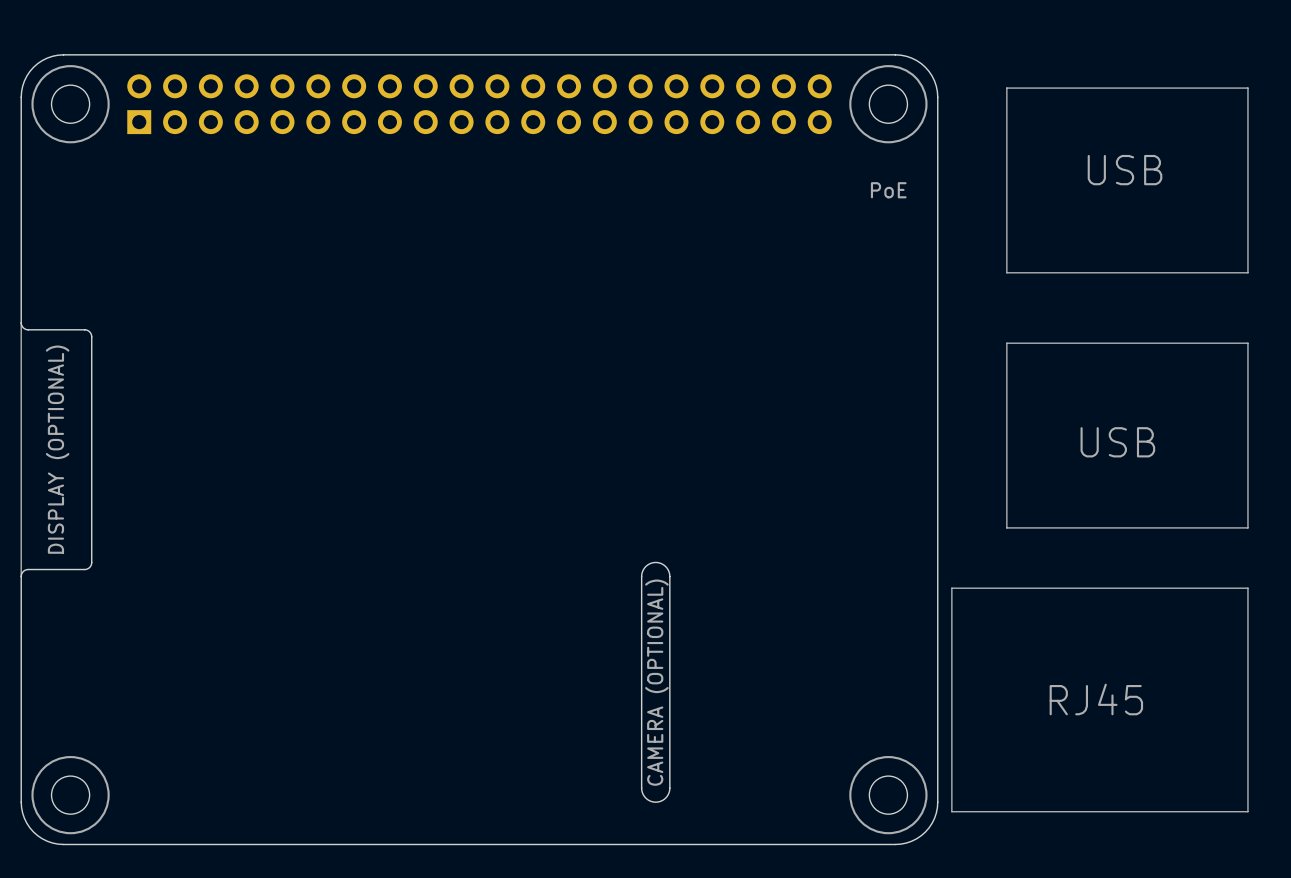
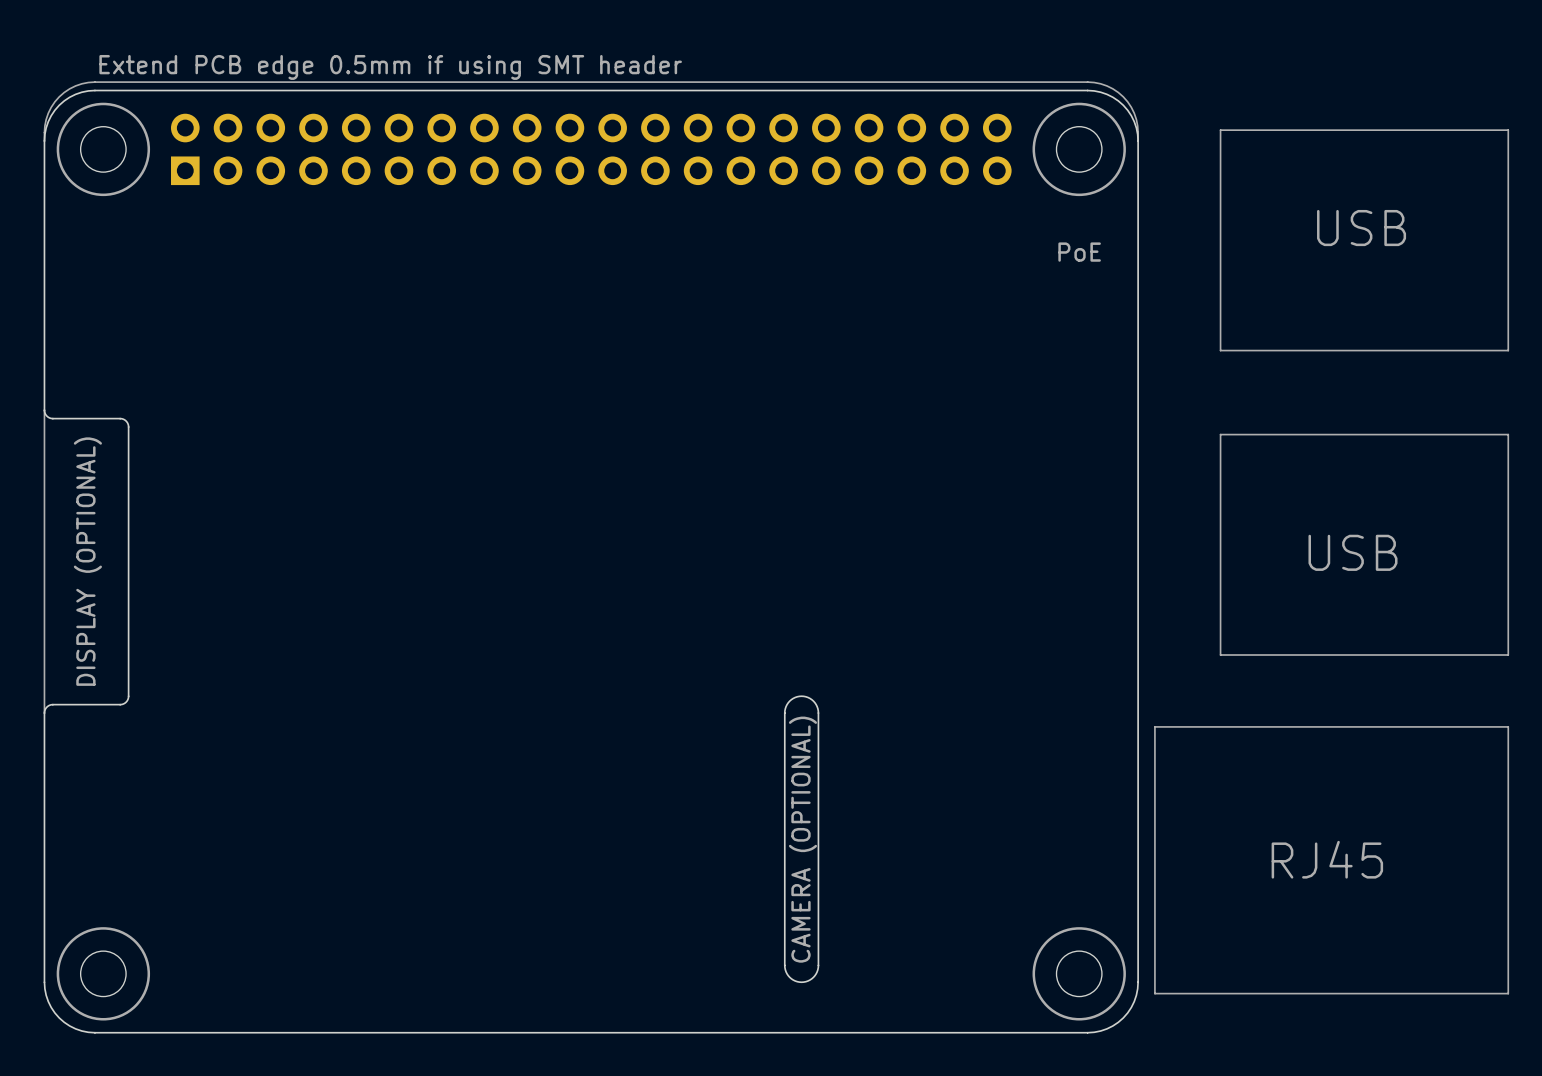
text: none -> Extend PCB edge 0.5mm if using SMT header (390, 67)
line: none -> (44, 140) (46, 119) (54, 101) (69, 88) (81, 83) (94, 82) (1087, 82) (1100, 83) (1112, 88) (1127, 101) (1136, 119) (1138, 140)

